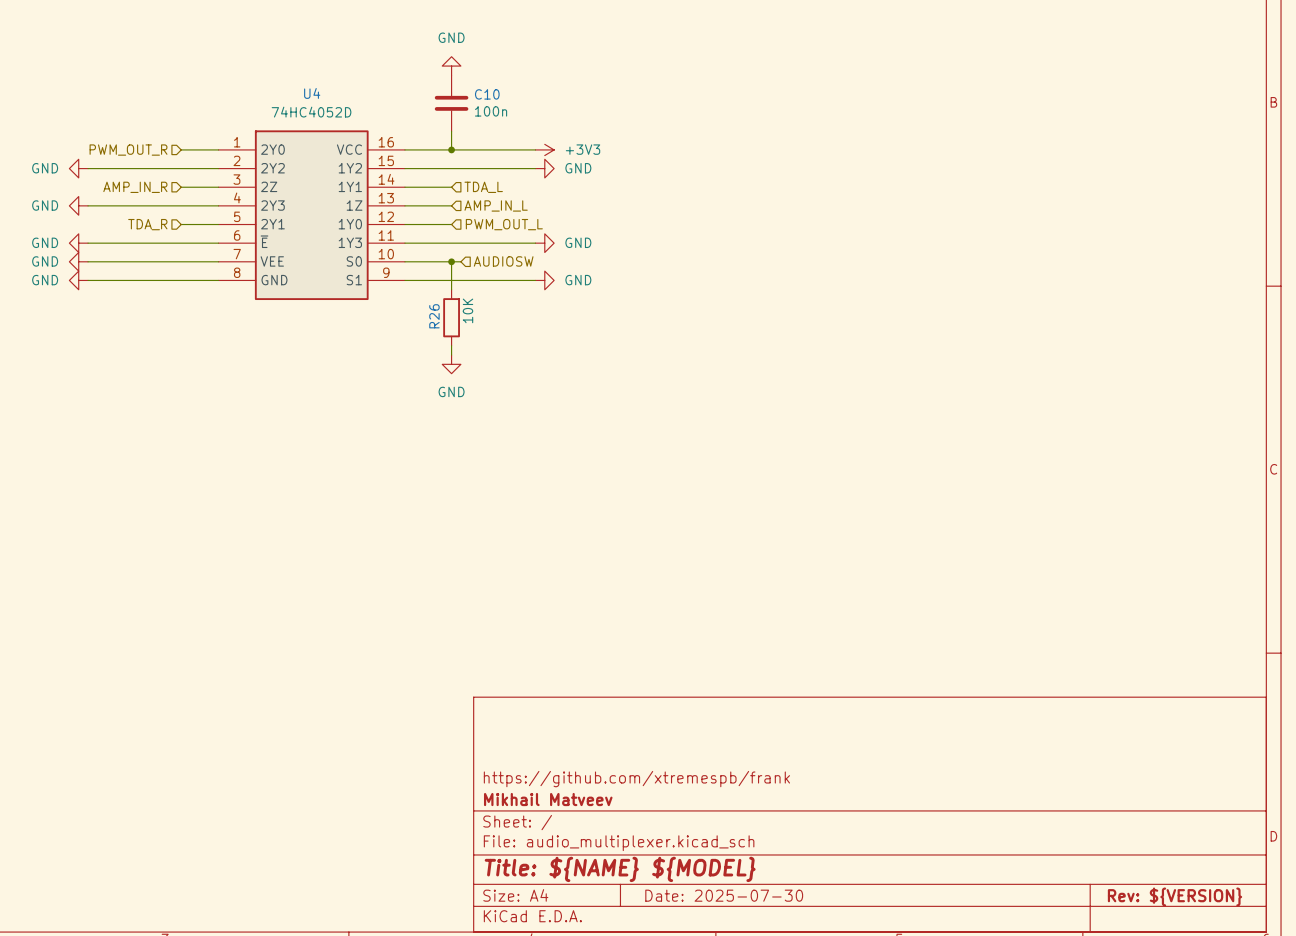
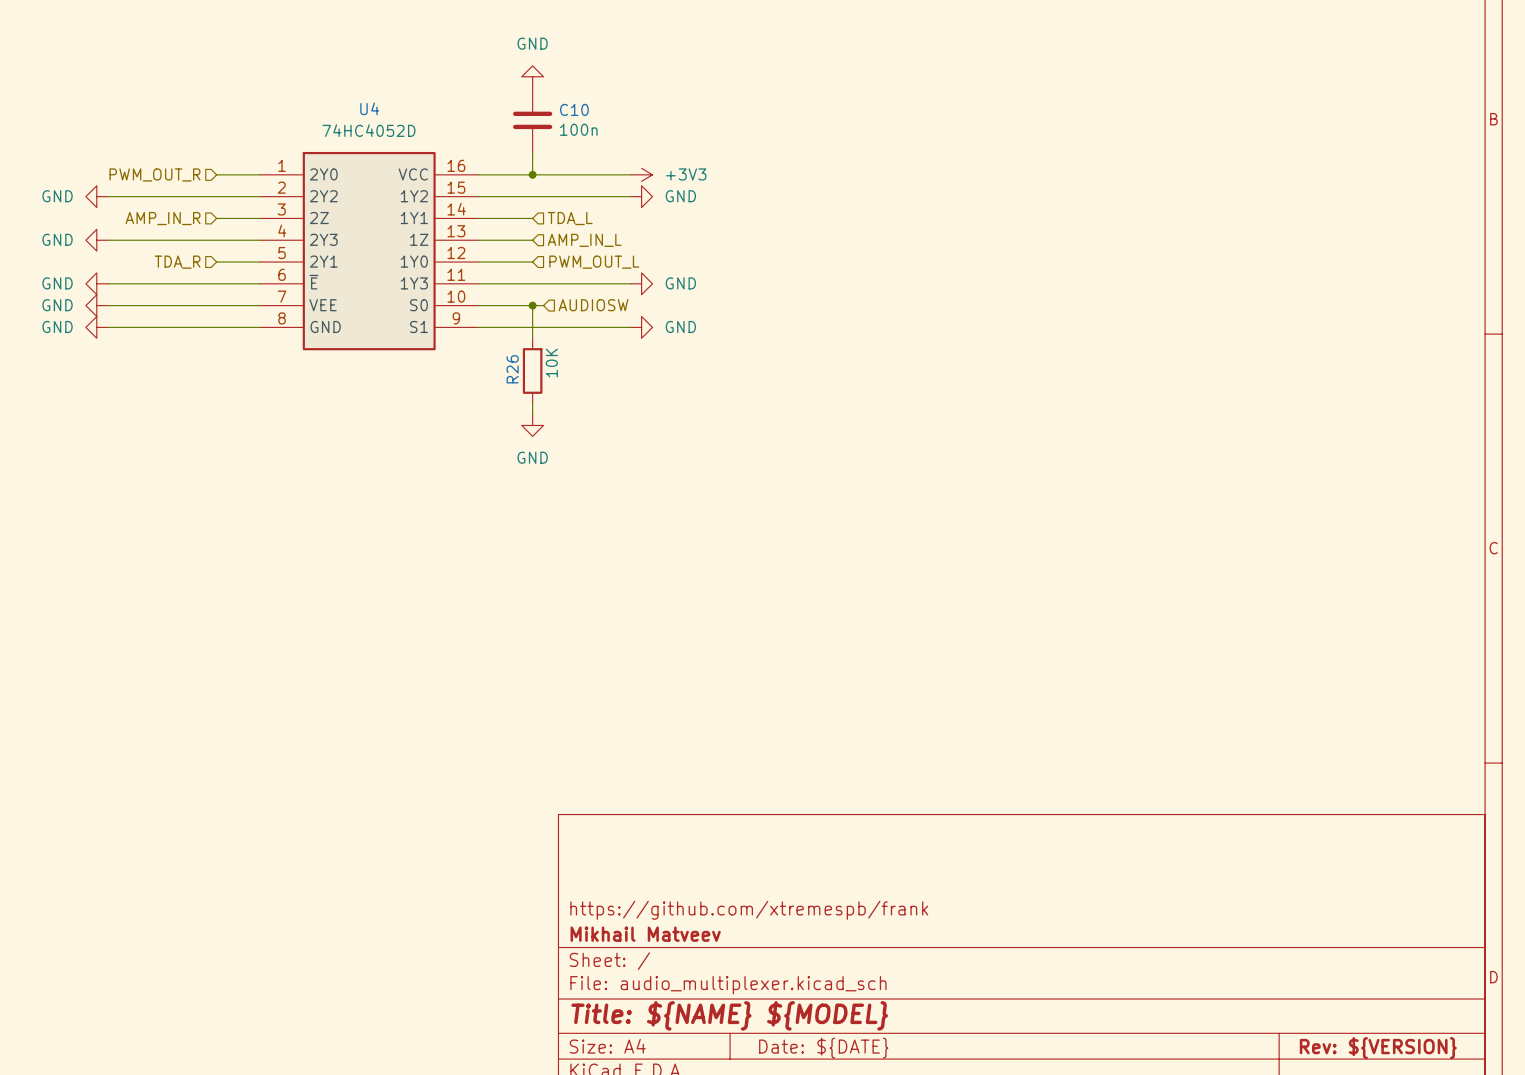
title block: Date: 2025-07-30 (724, 895) -> Date: ${DATE} (823, 1048)

